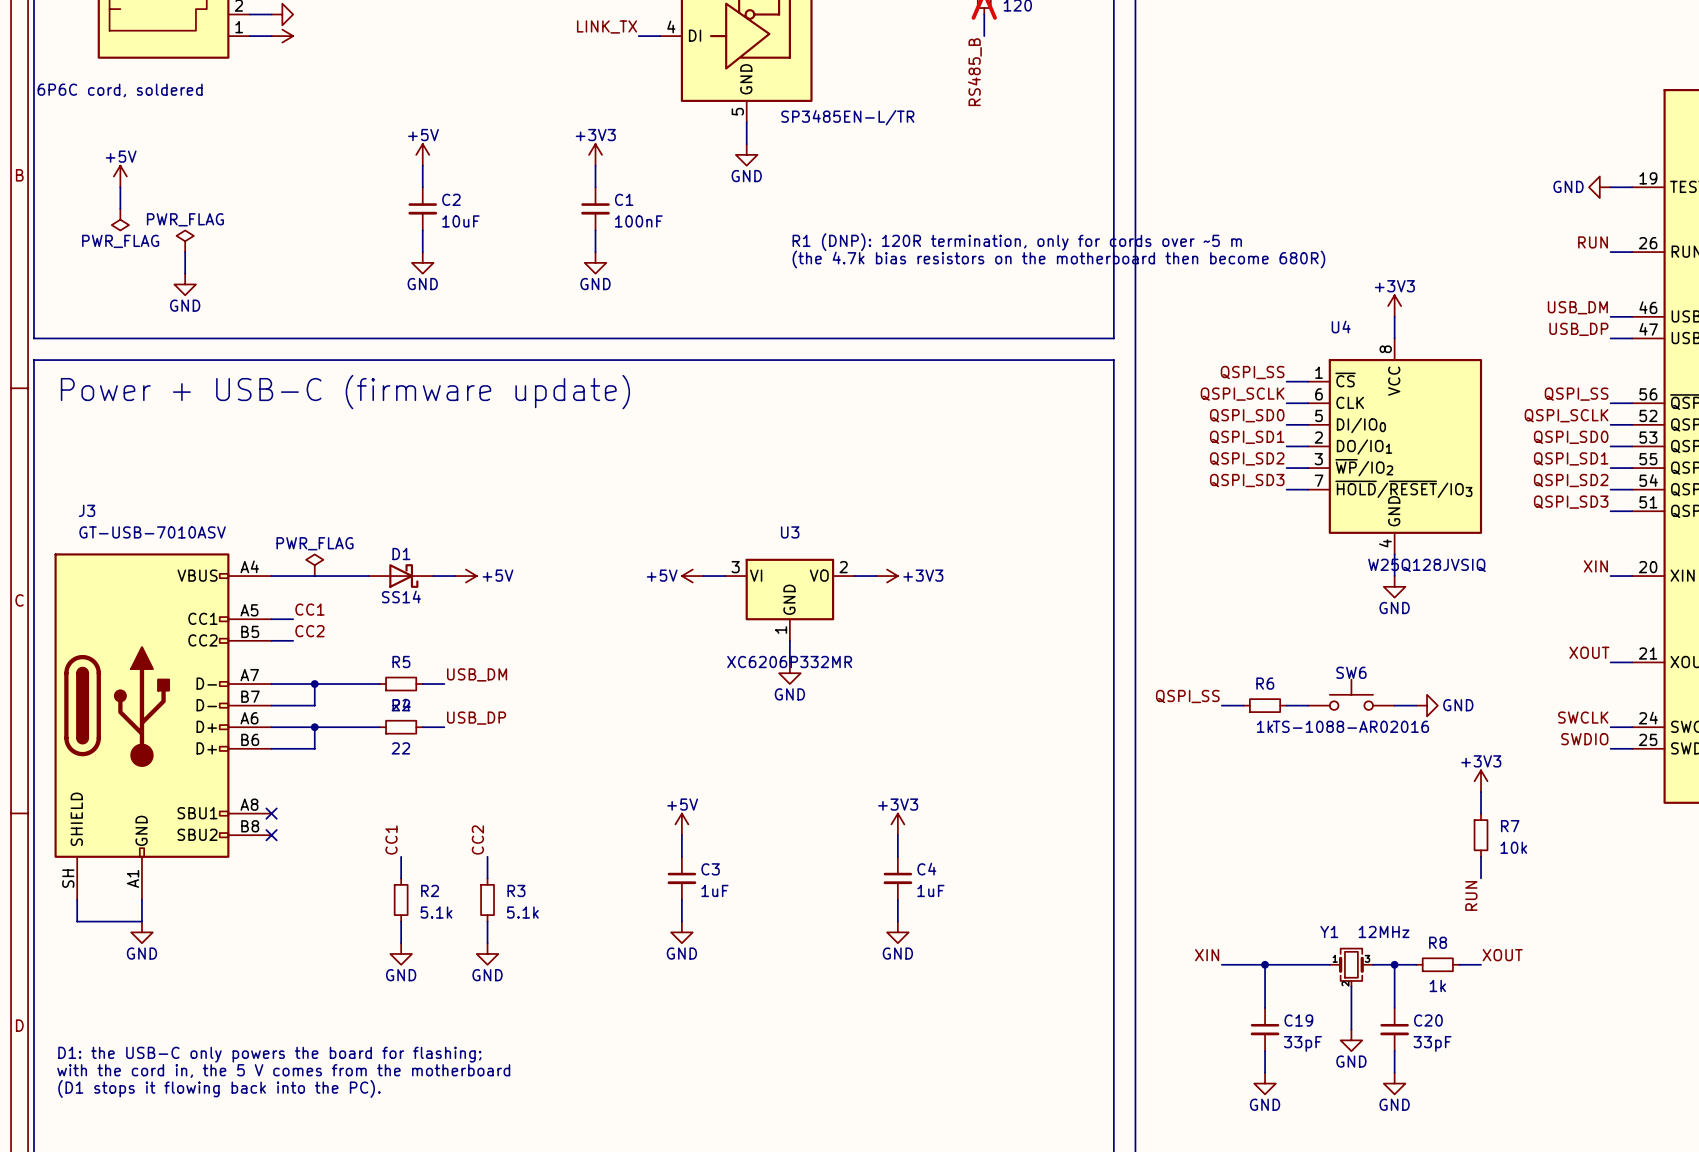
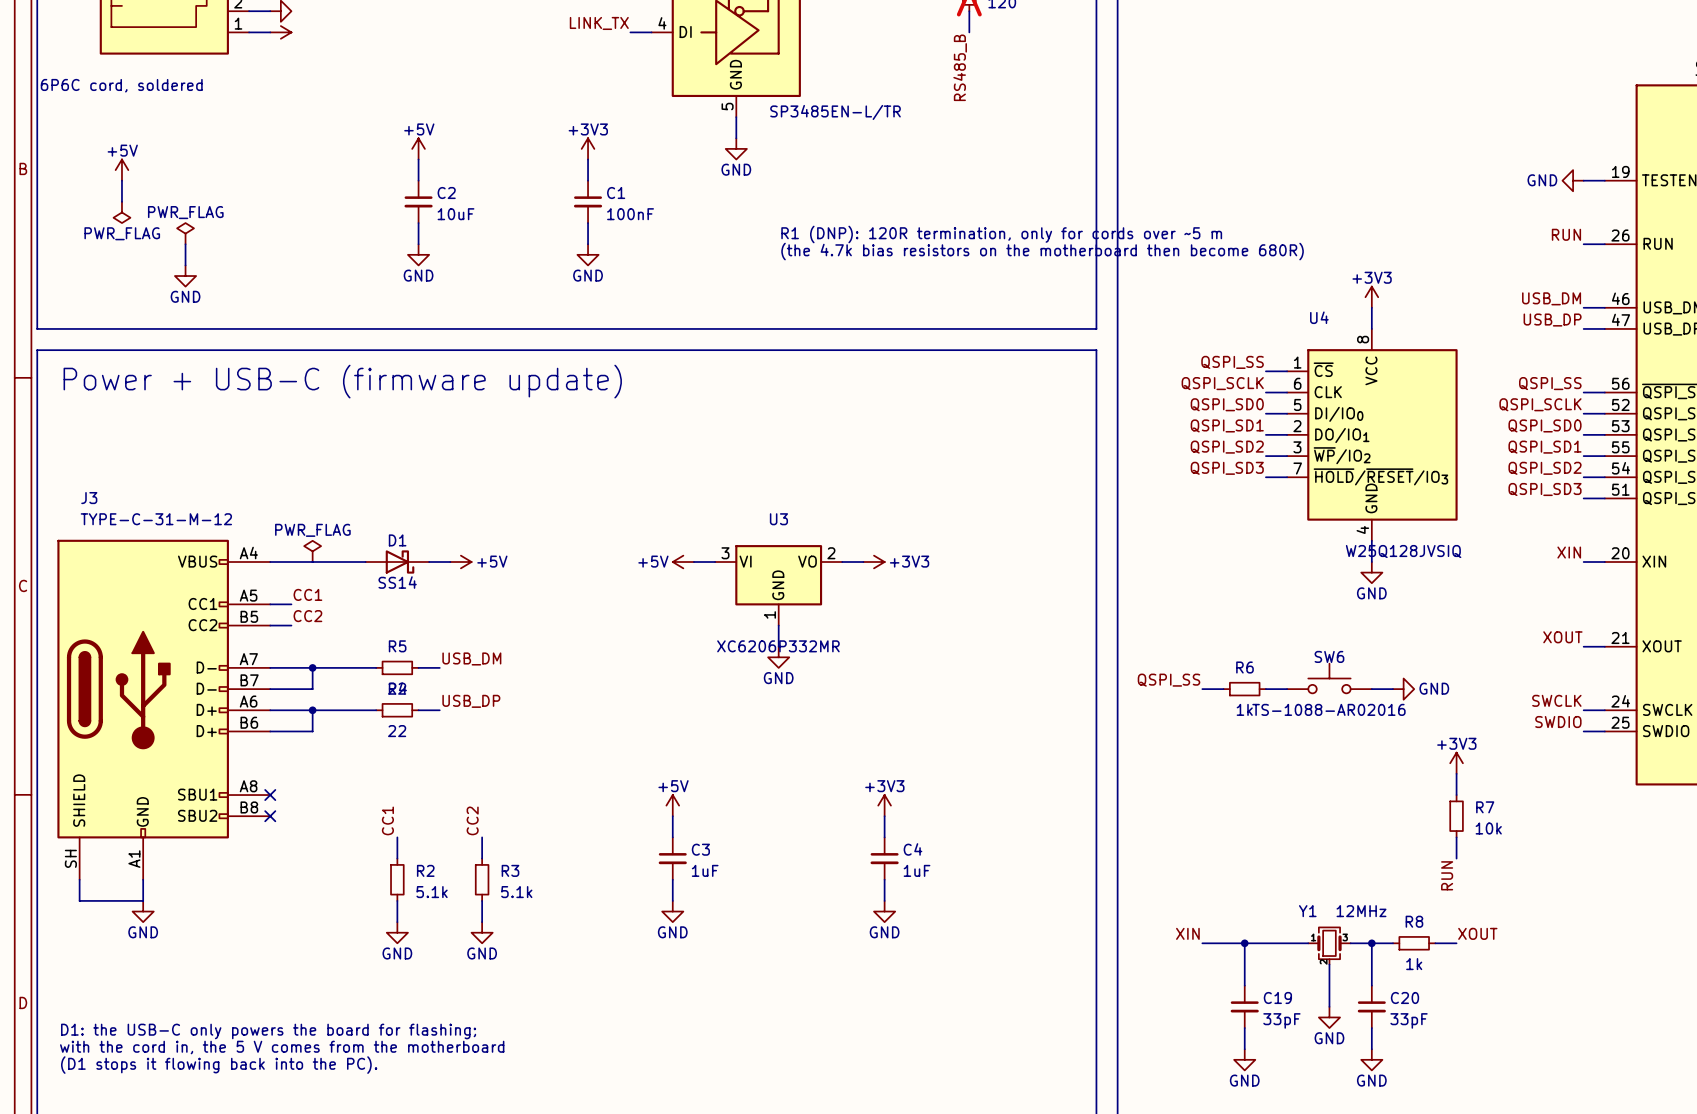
J3 value: GT-USB-7010ASV (152, 532) -> TYPE-C-31-M-12 (156, 519)

